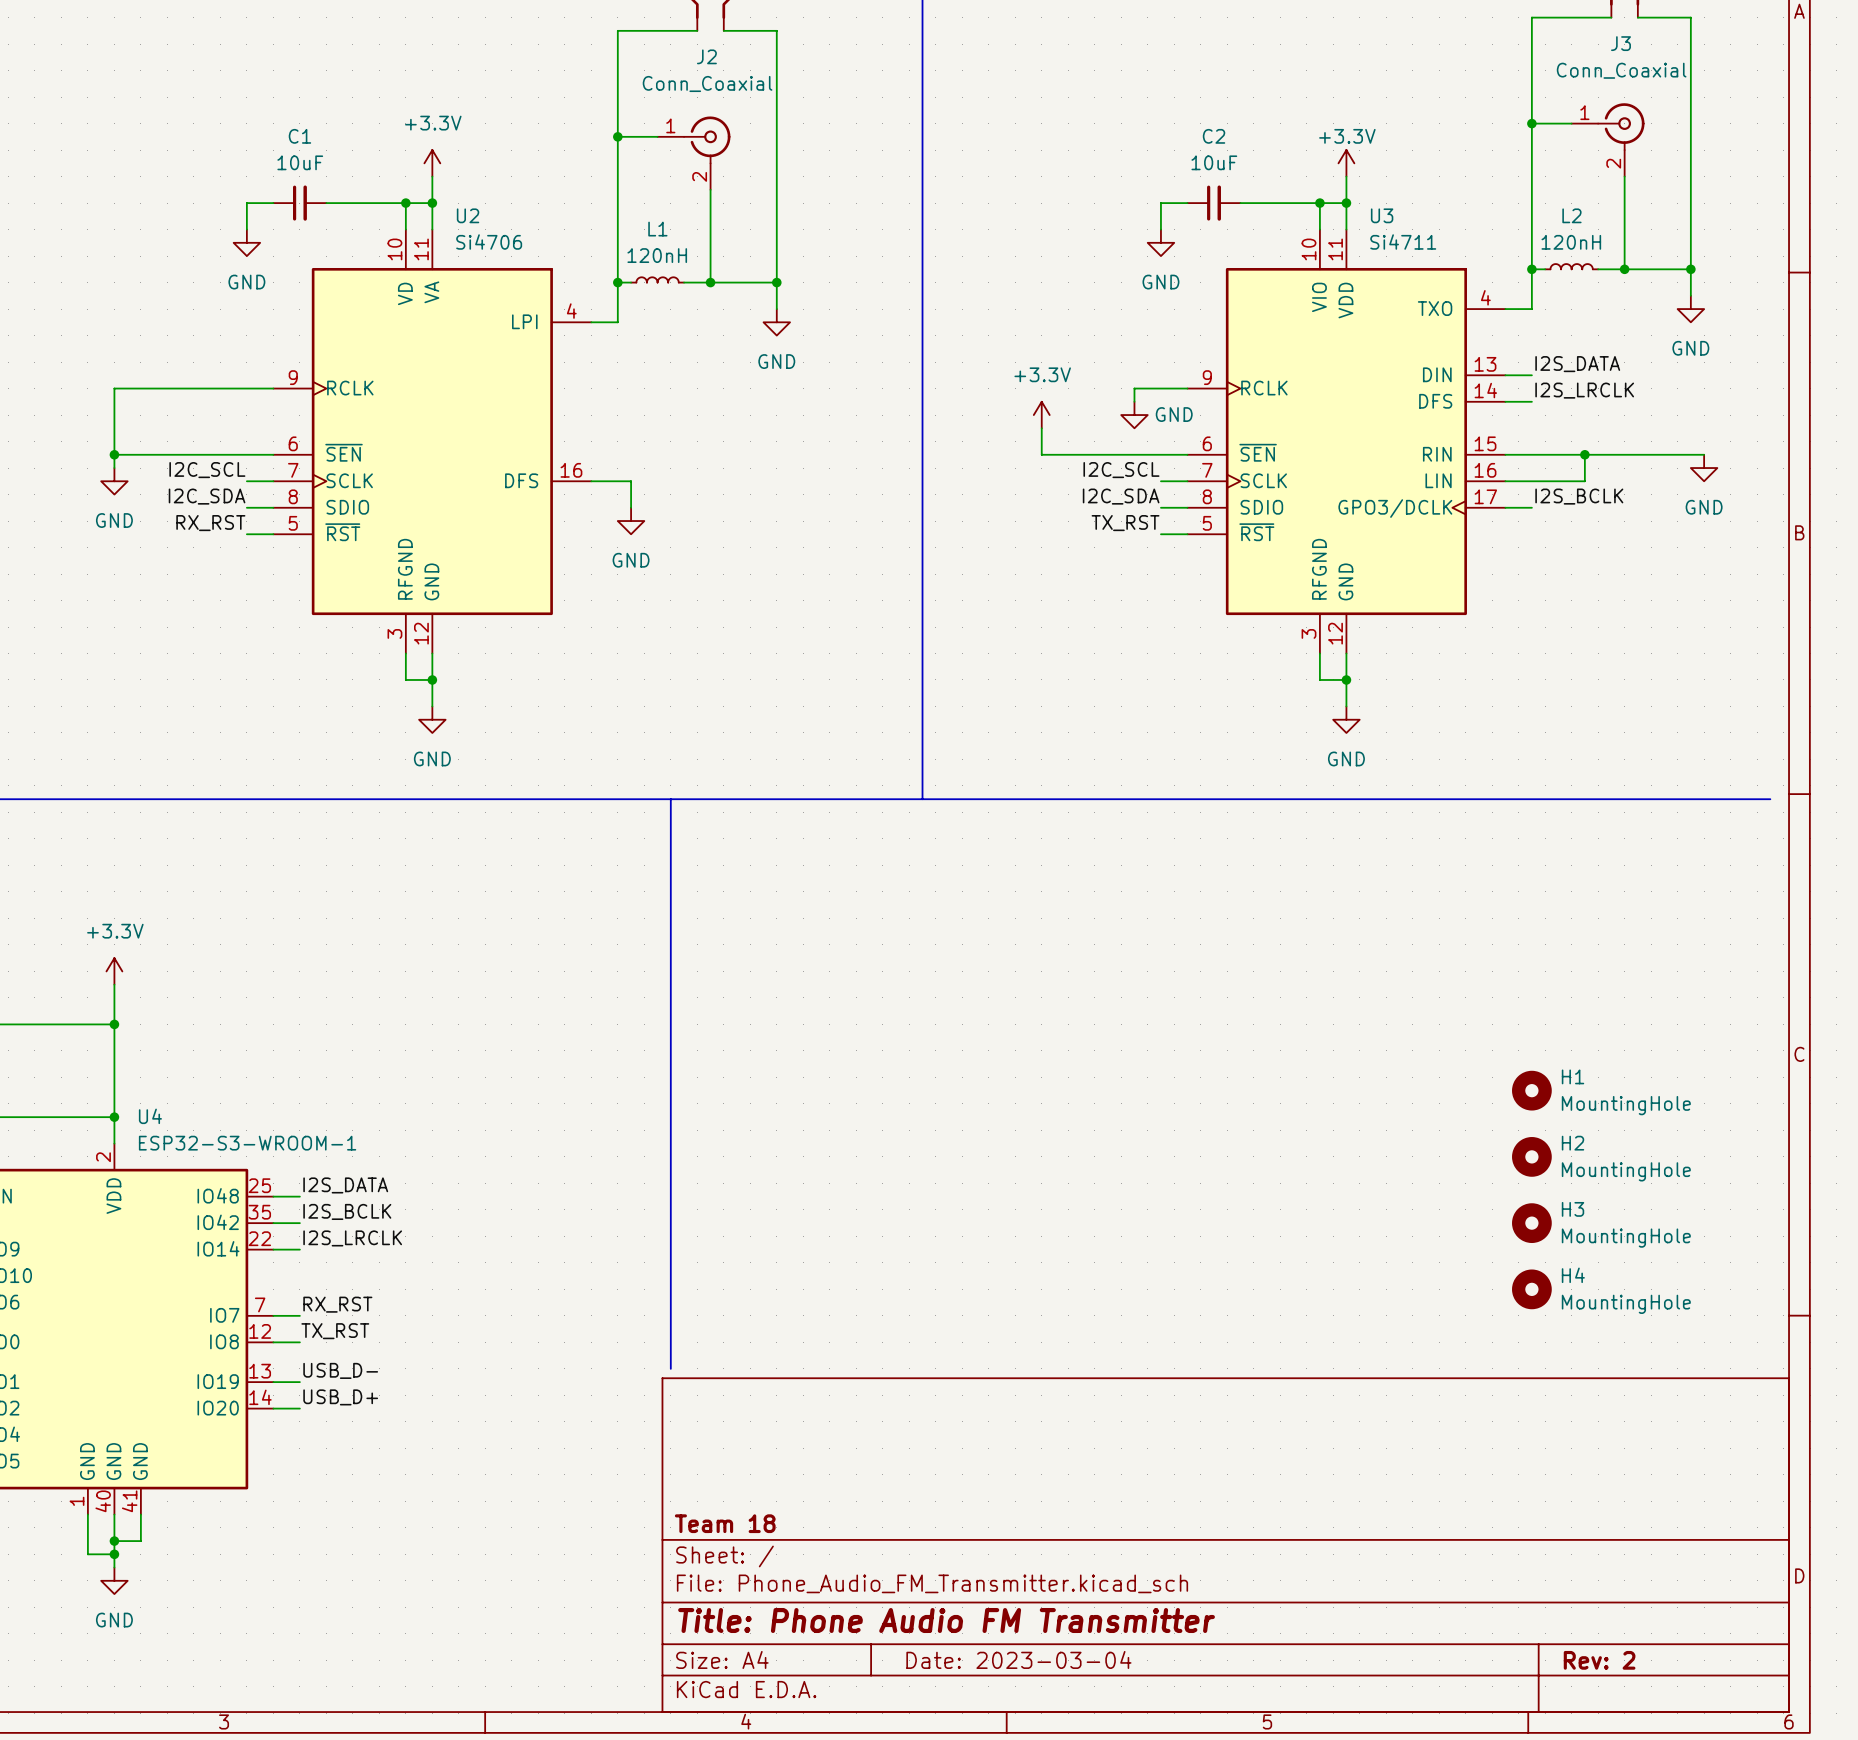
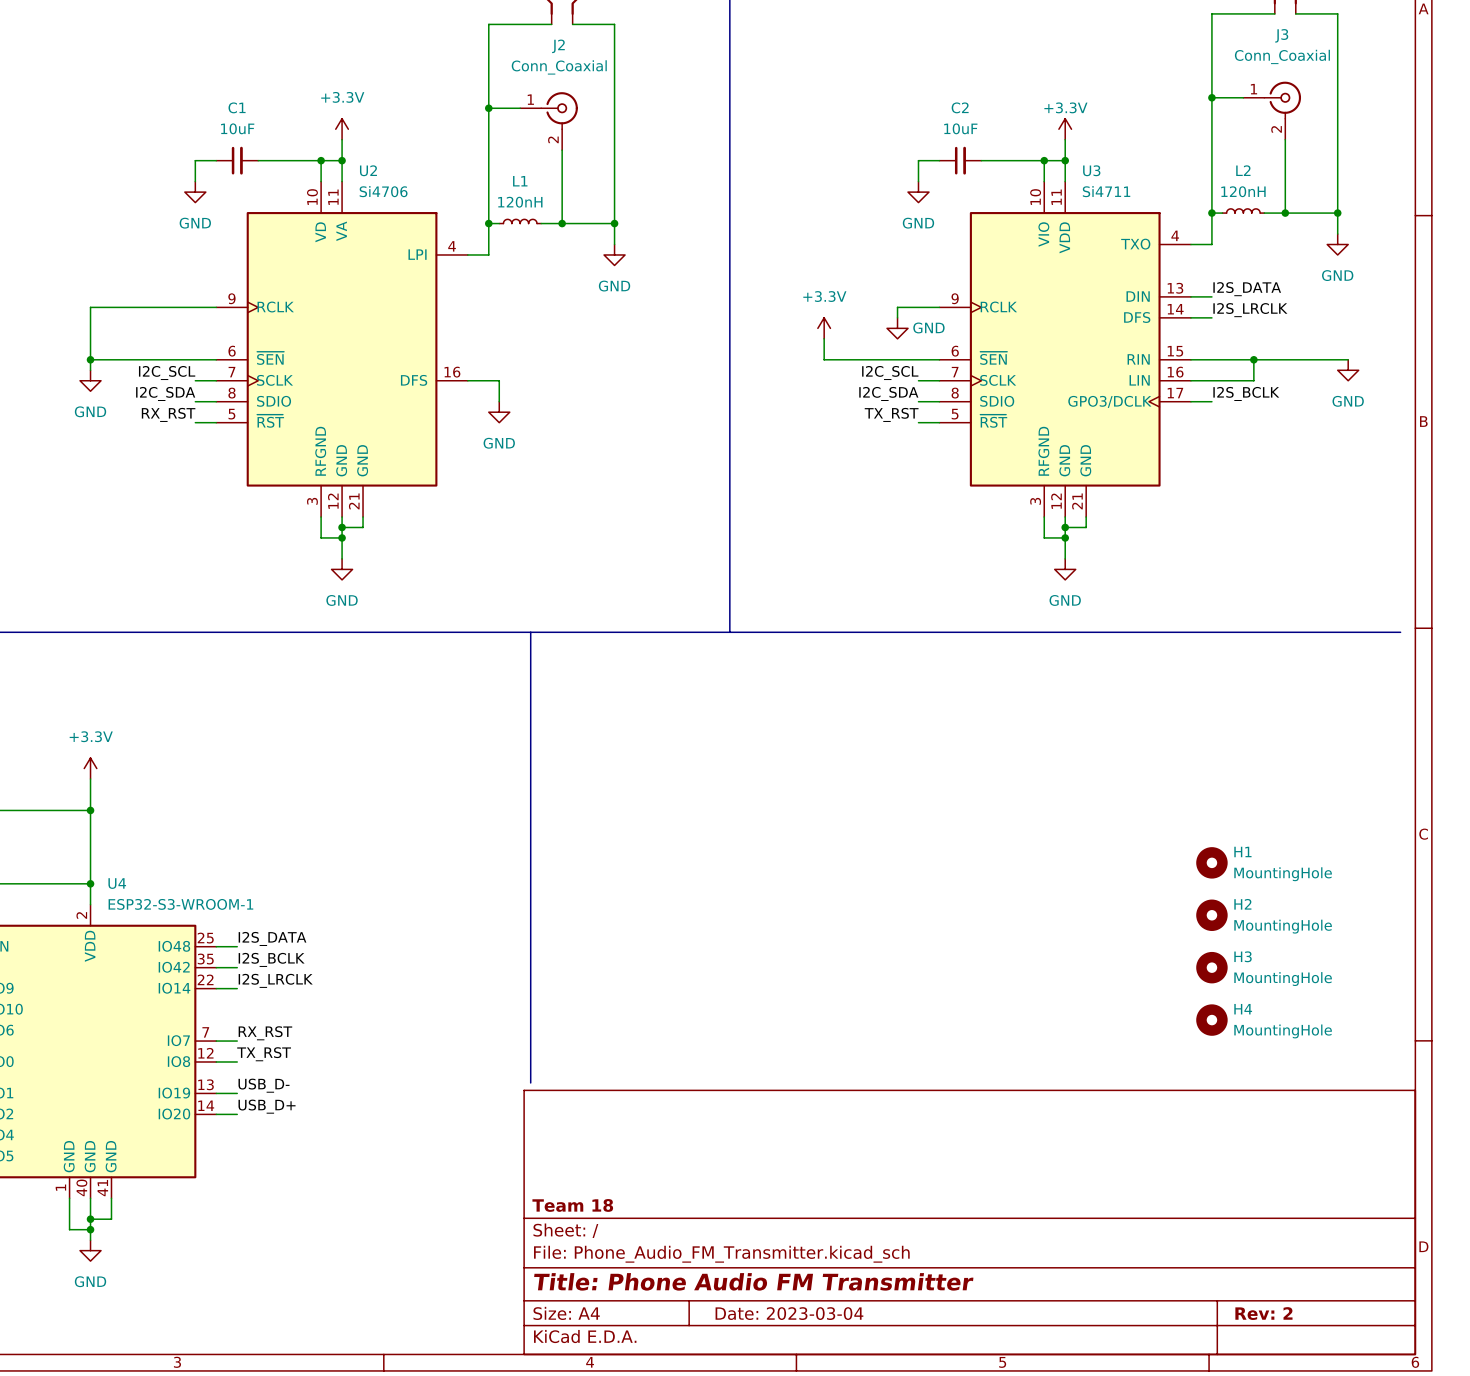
U2 symbol: [273, 229, 592, 654] -> [216, 181, 468, 518]
U3 symbol: [1187, 229, 1506, 654] -> [939, 181, 1191, 518]
wire: none -> (363, 517) (363, 527) (342, 527)
wire: none -> (1086, 517) (1086, 527) (1065, 527)
junction: none -> (342, 527)
junction: none -> (1065, 527)

